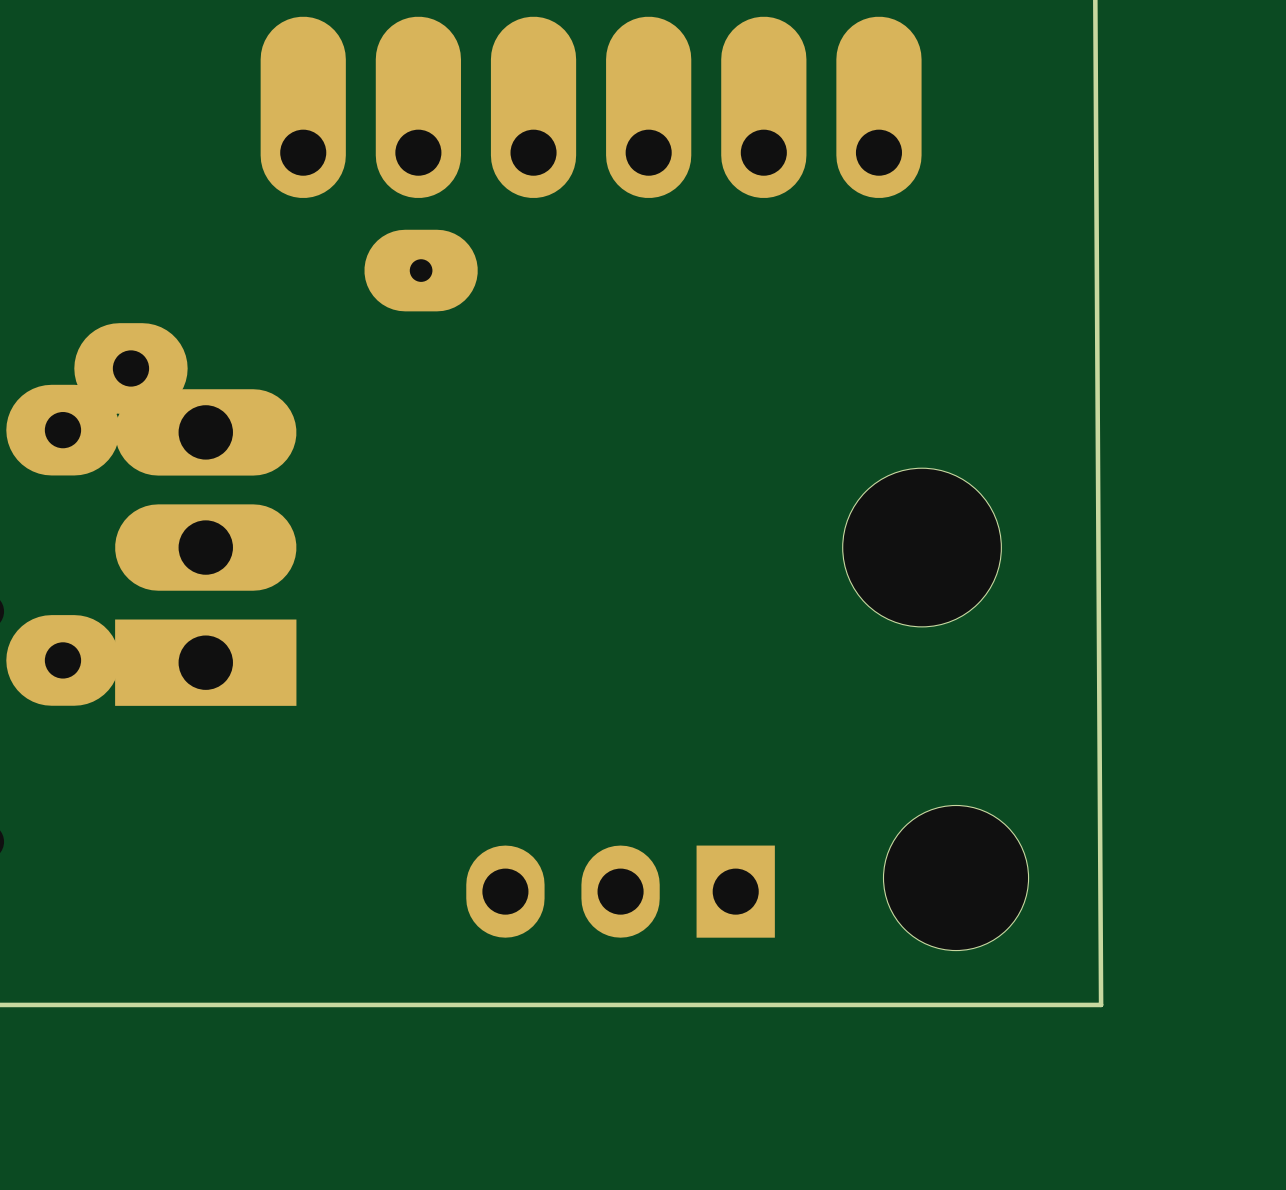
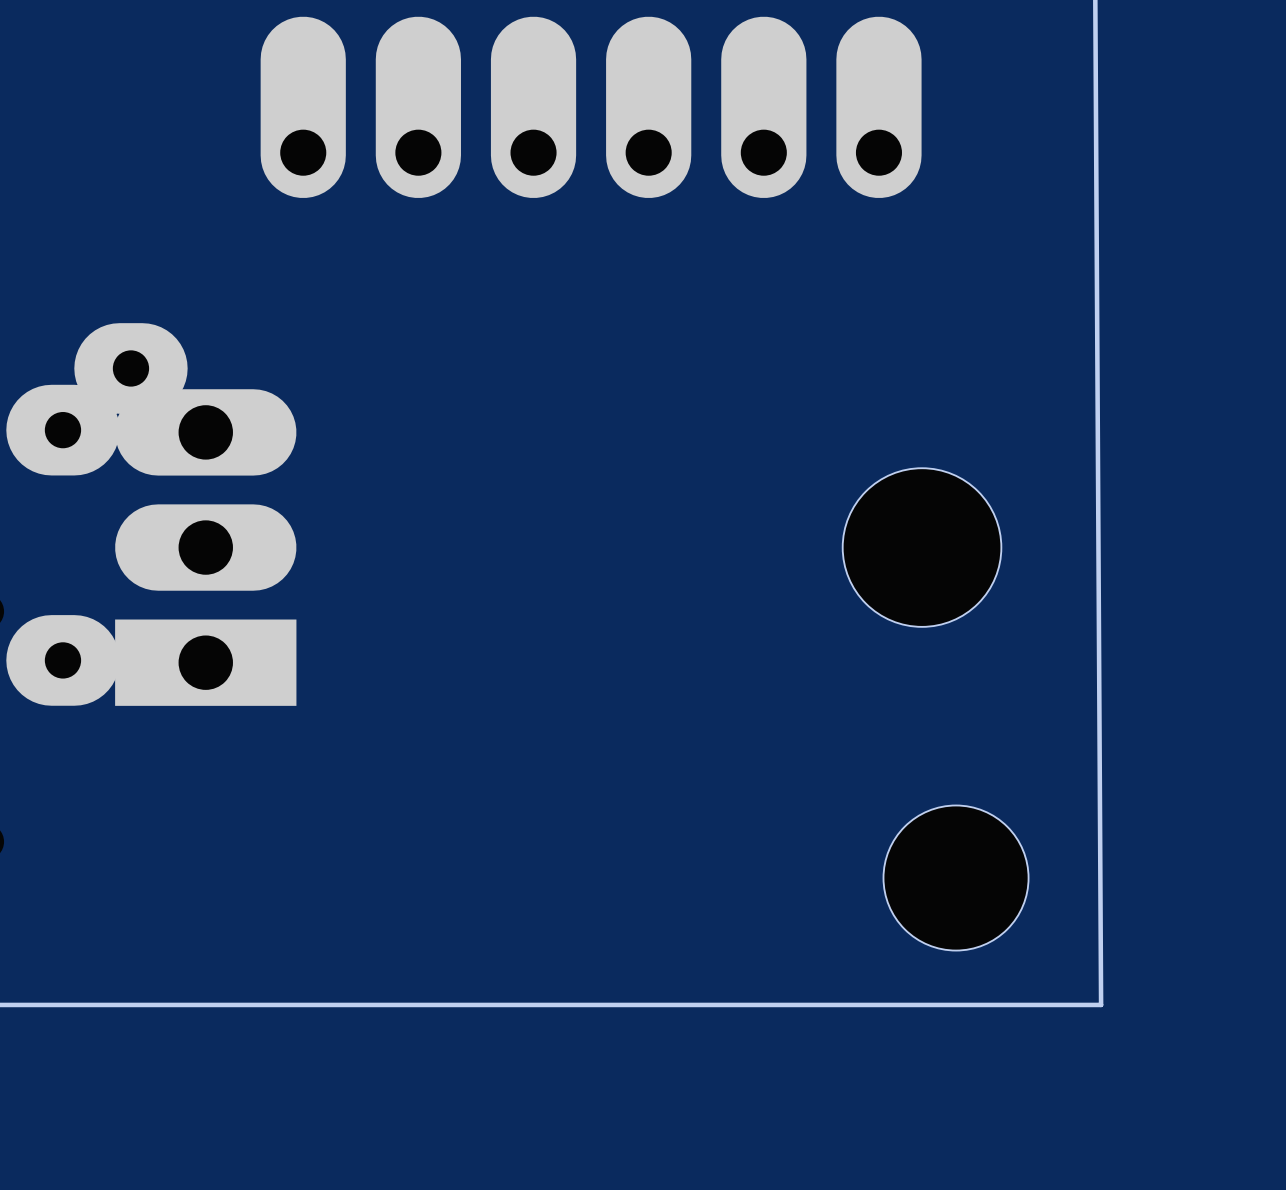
part: (421, 270) -> none
part: (620, 891) -> none

